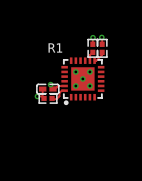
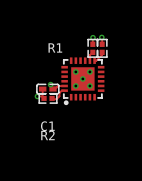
C1 name: none -> C1 (47, 126)
R2 name: none -> R2 (47, 135)

